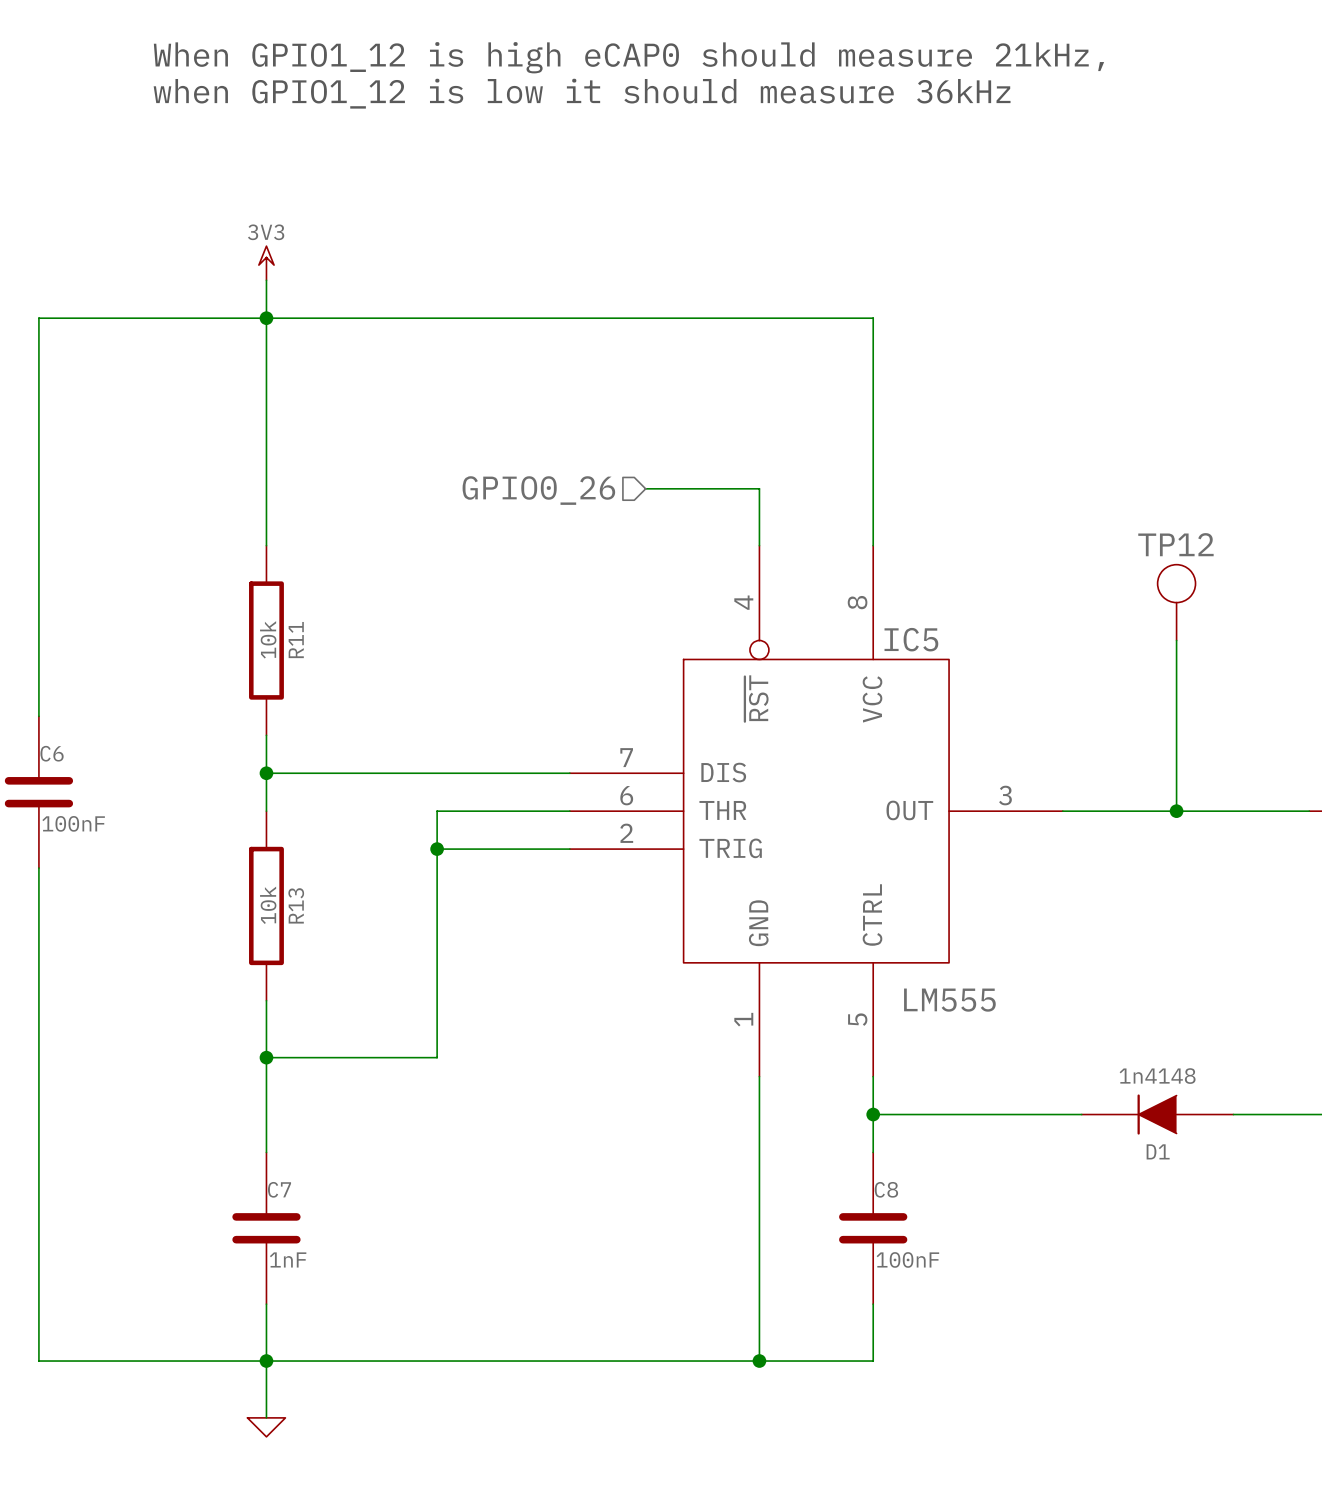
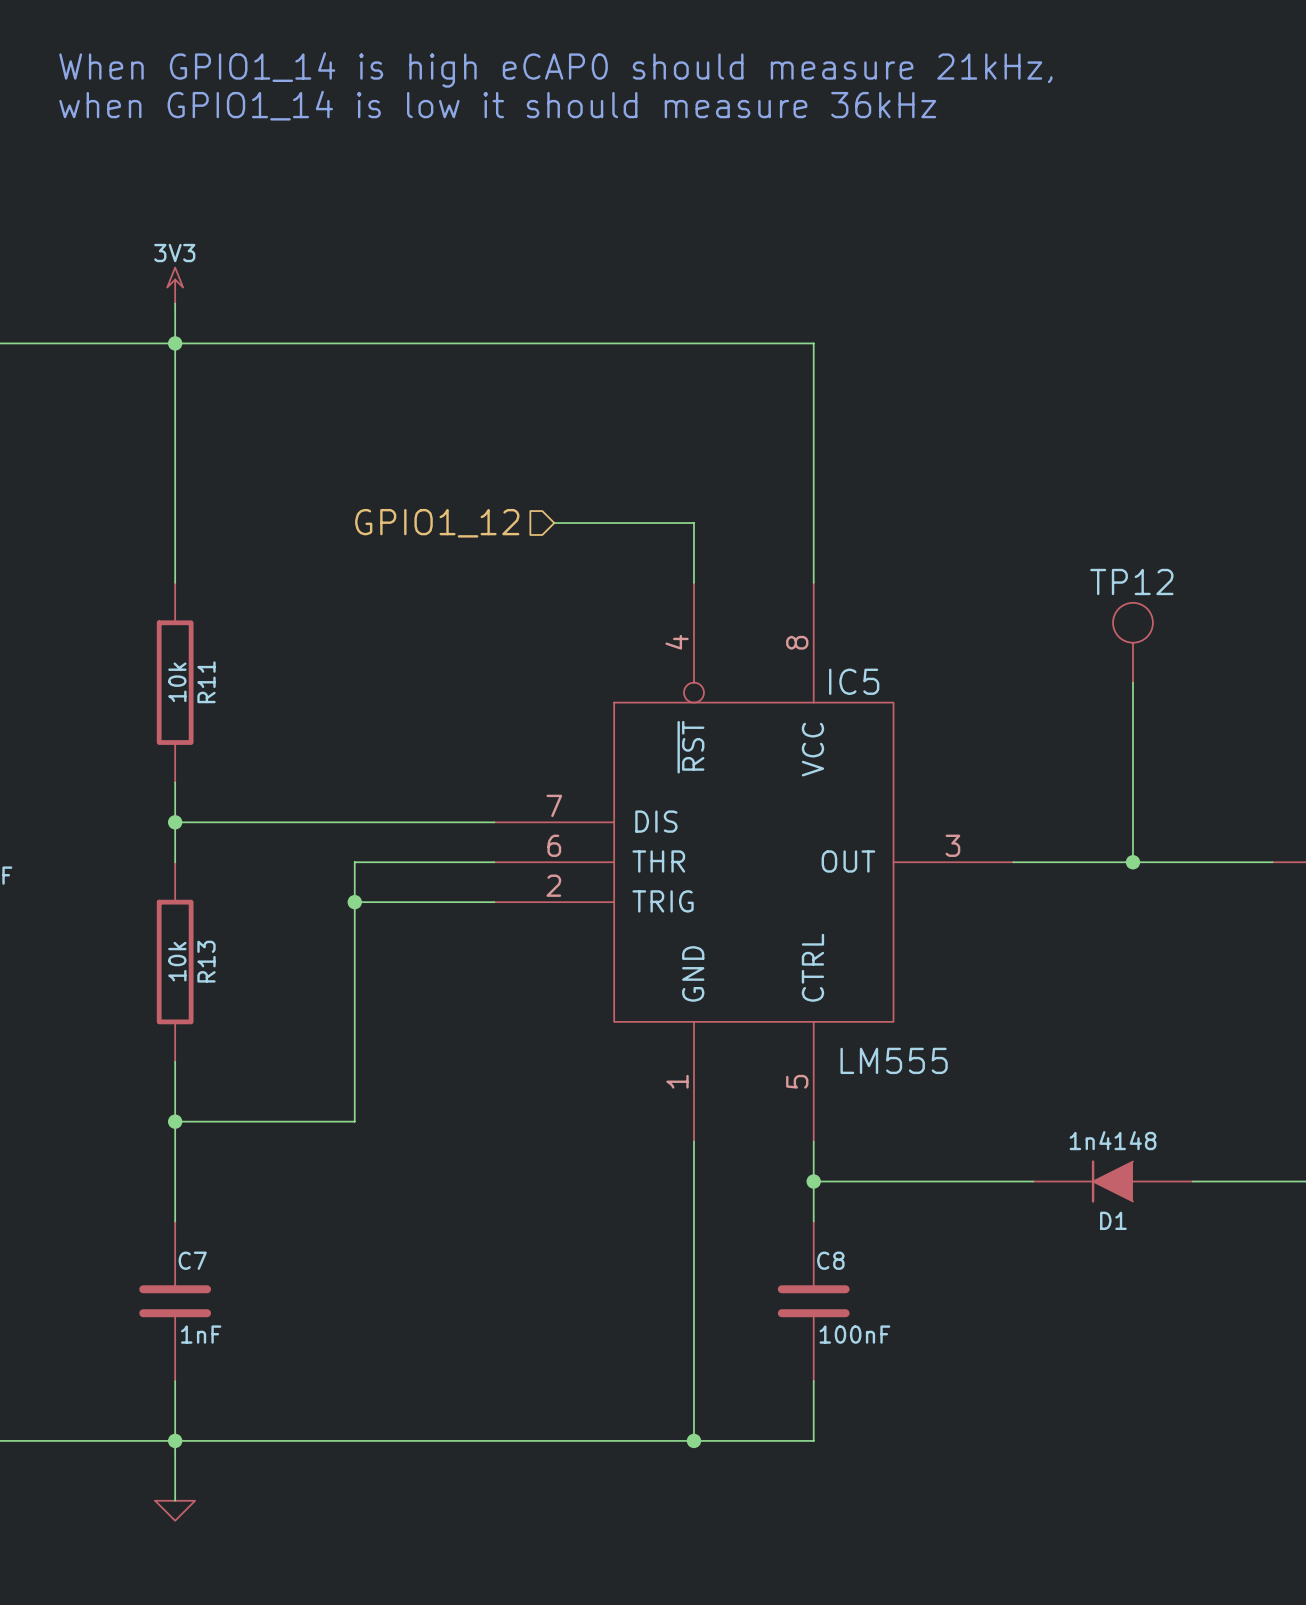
text: When GPIO1_12 is high eCAP0 should measure 21kHz, (628, 57) -> When GPIO1_14 is high eCAP0 should measure 21kHz, (555, 69)
text: when GPIO1_12 is low it should measure 36kHz (582, 93) -> when GPIO1_14 is low it should measure 36kHz (497, 105)
wire: none -> (554, 523) (574, 523)
hierarchical label: GPIO0_26 (538, 490) -> GPIO1_12 (437, 523)

